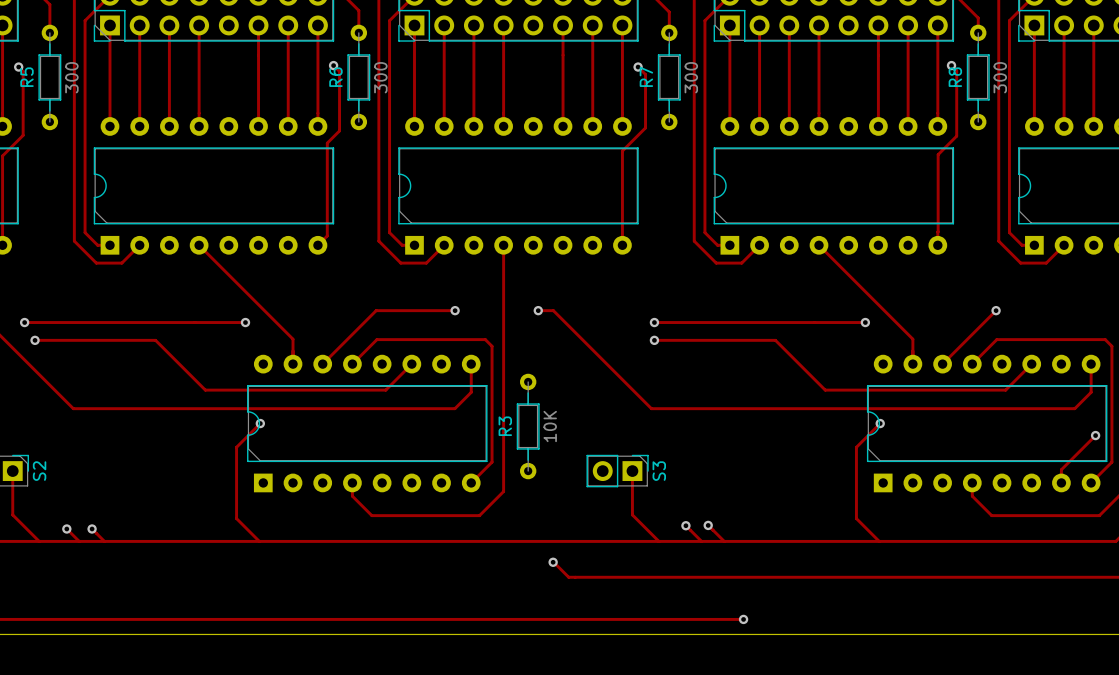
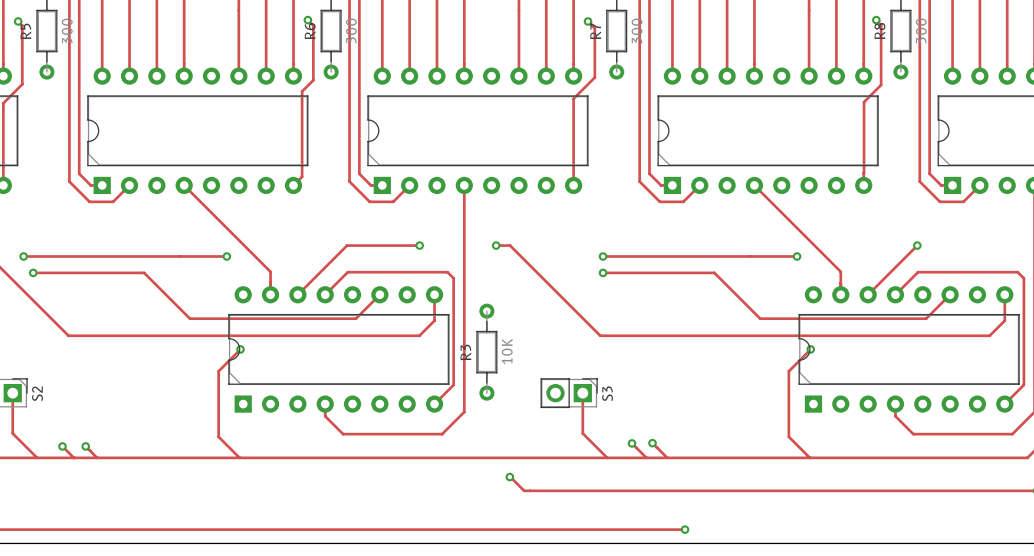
track: (1095, 435) (1061, 469) (1061, 482) -> none
via: (1095, 435) -> none

